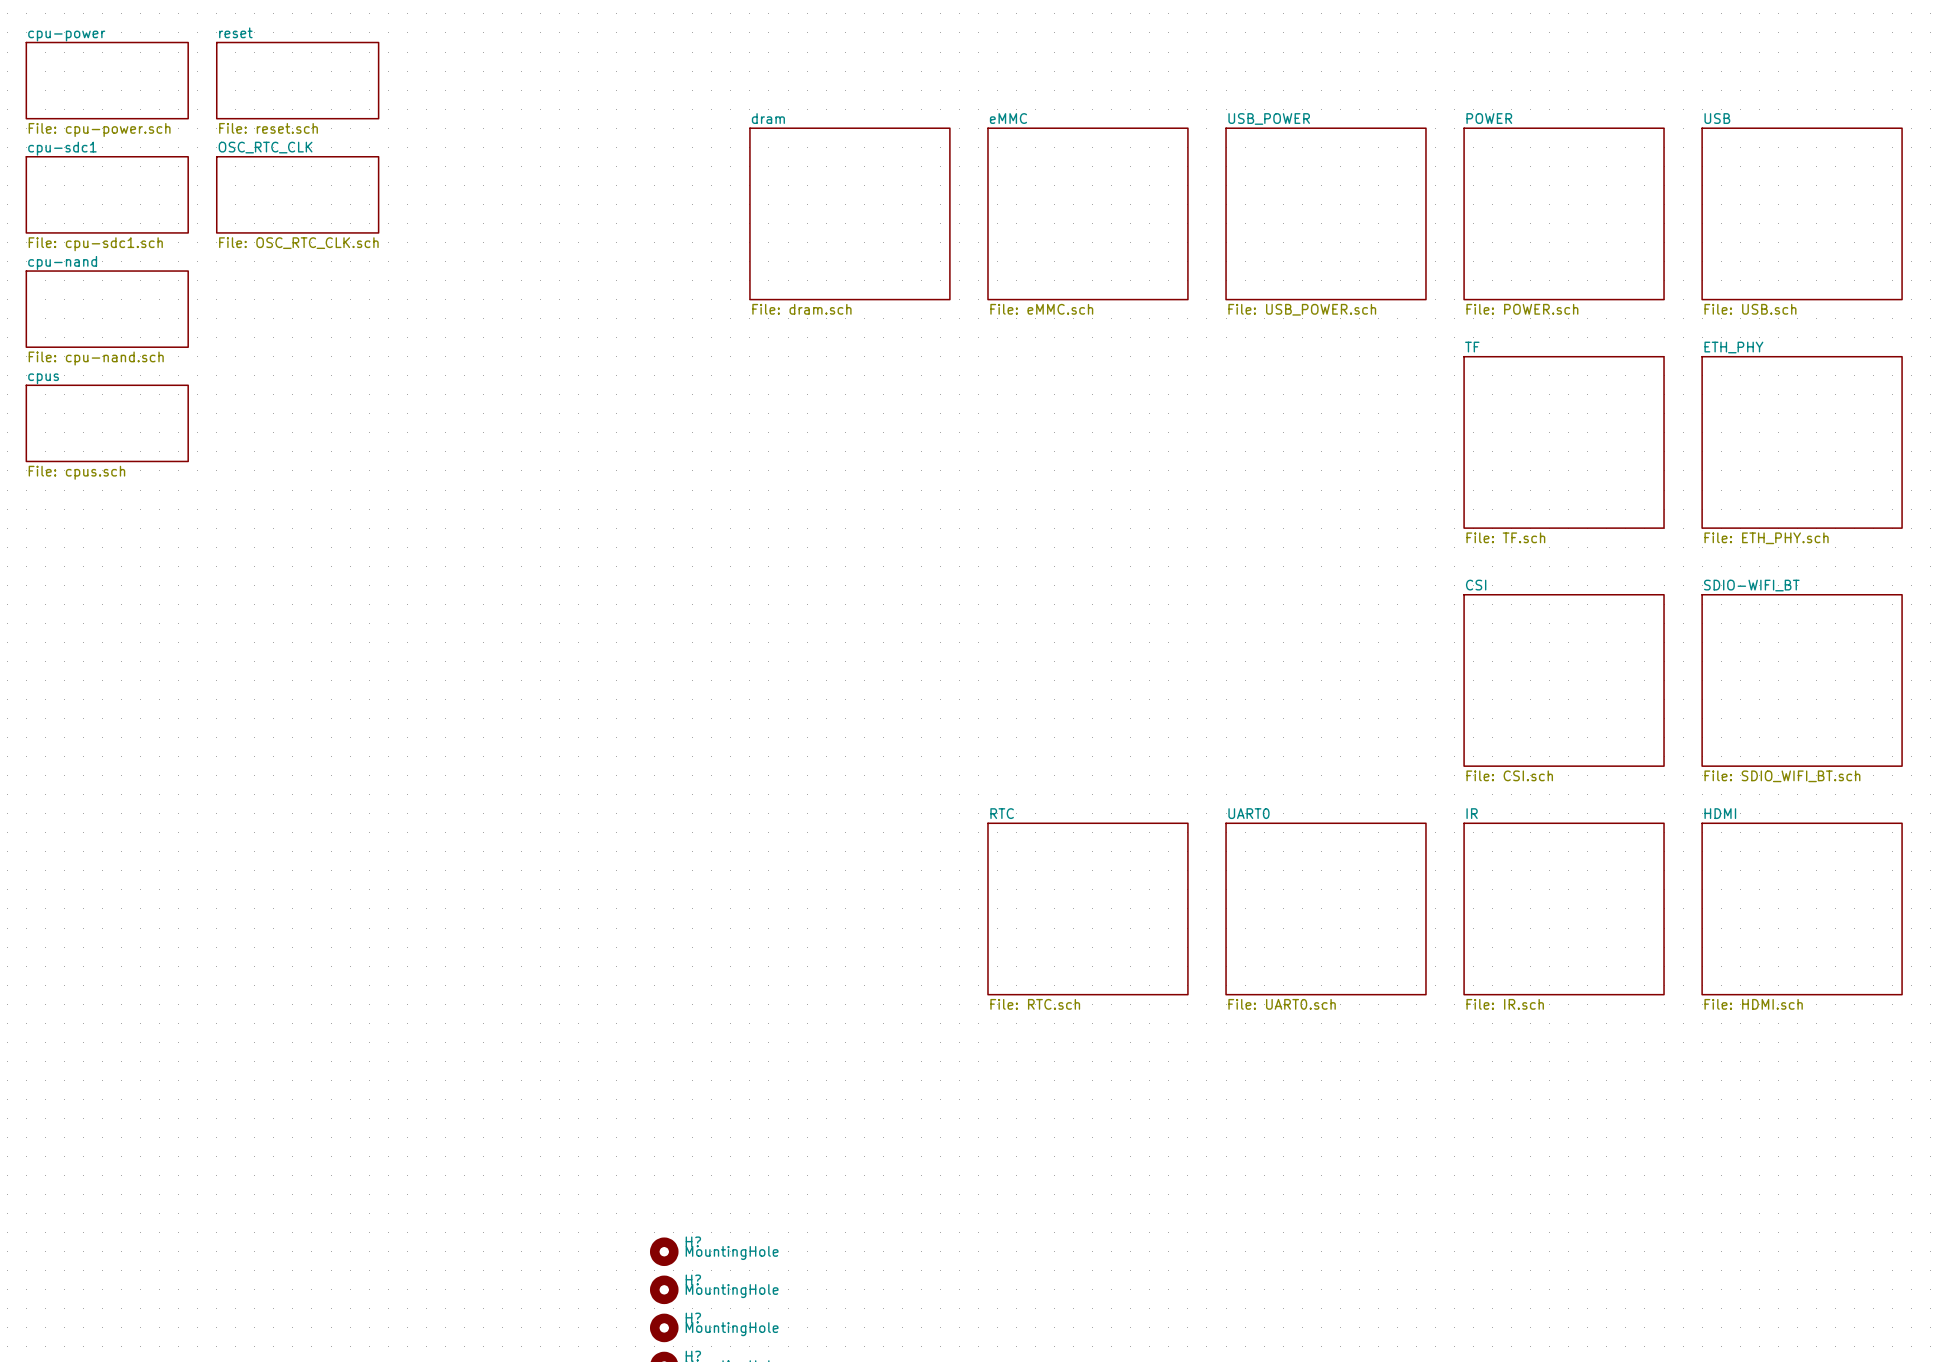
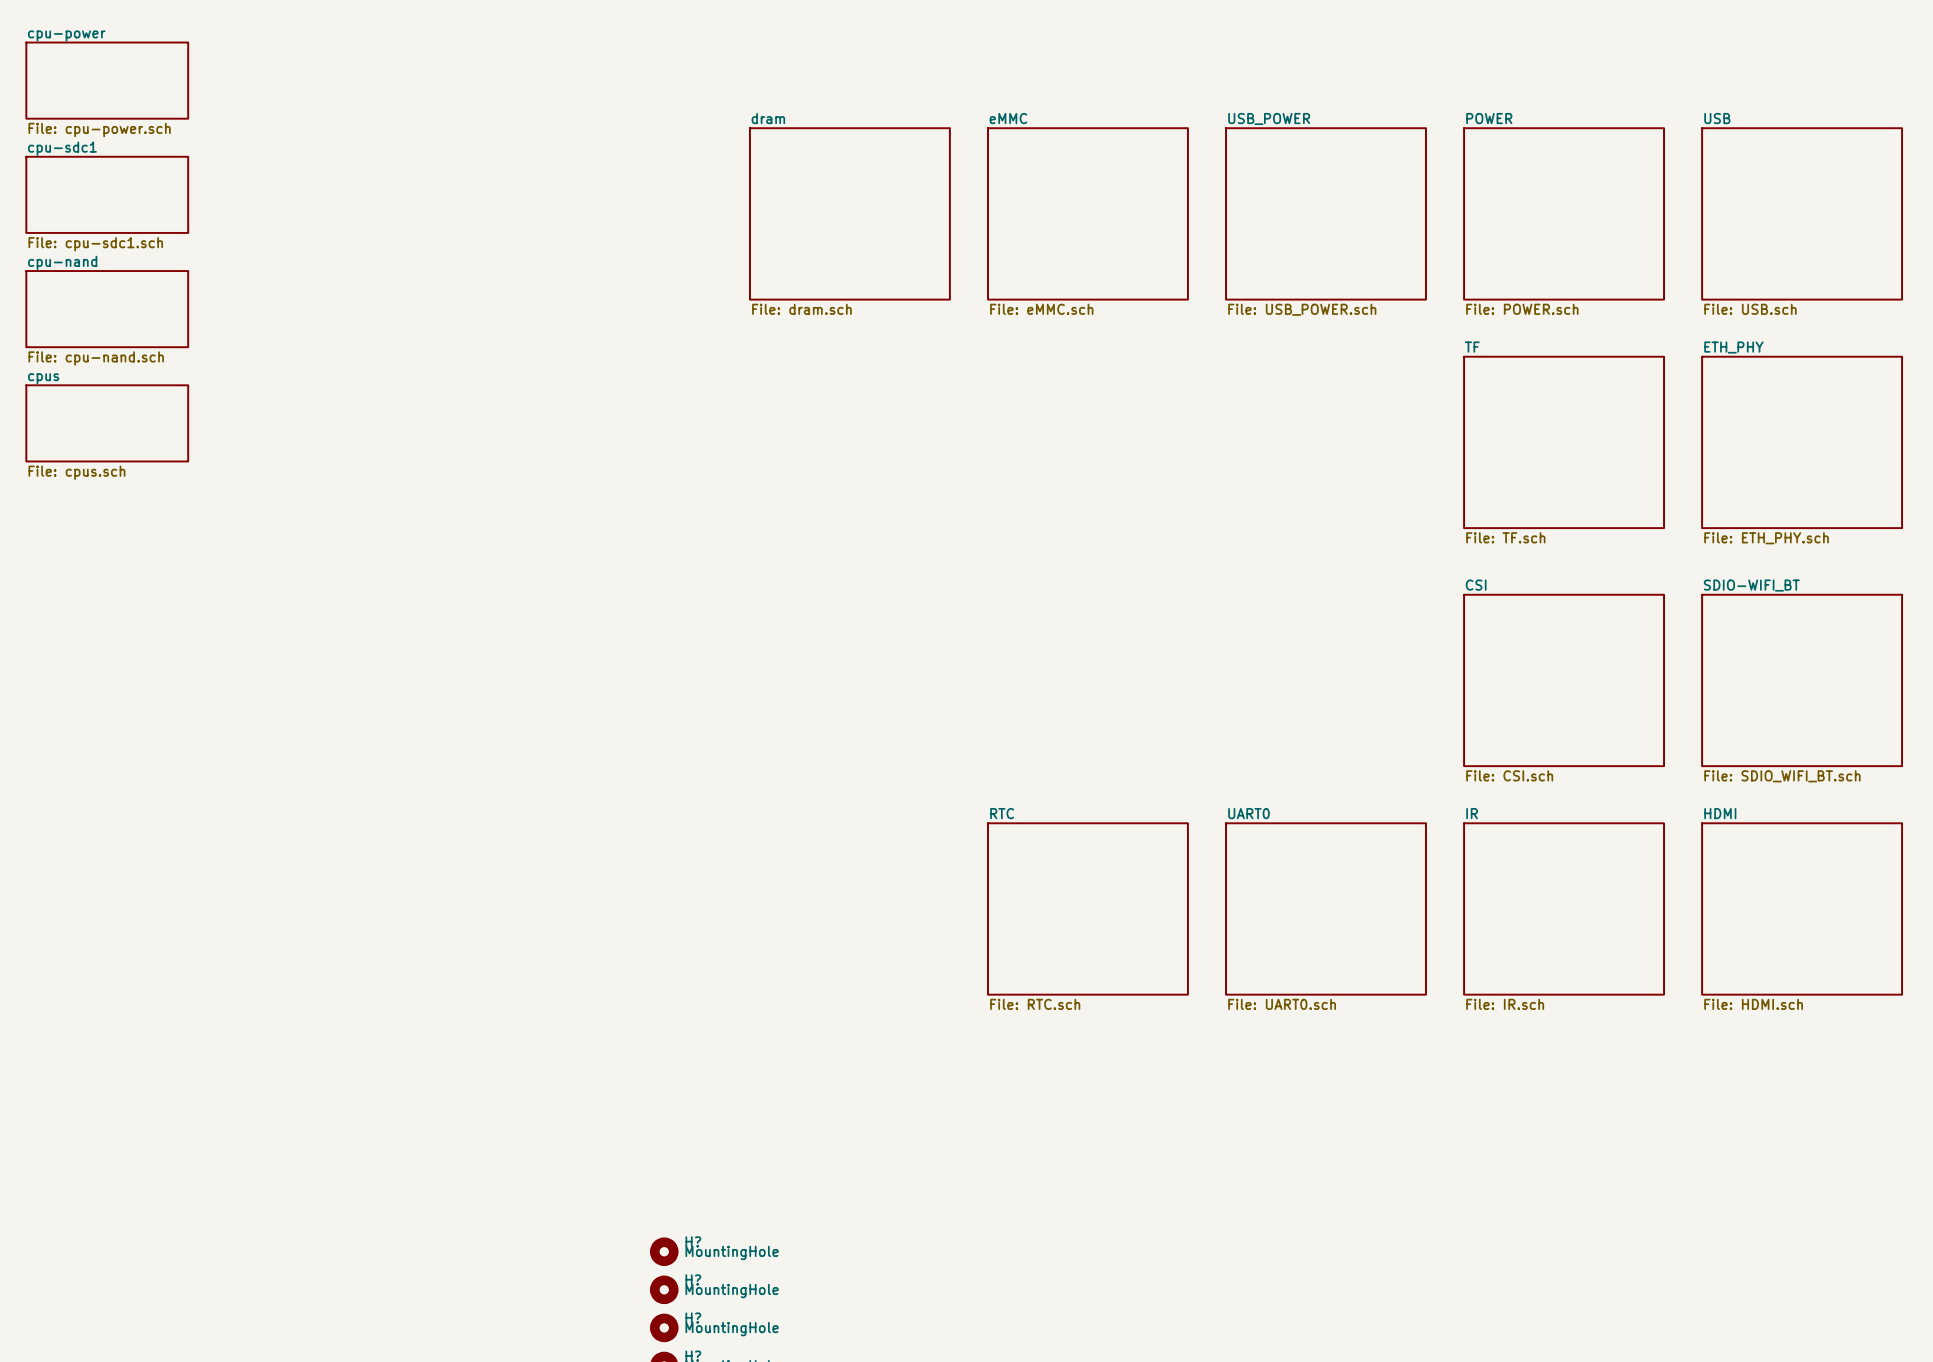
sheet reset: File: reset.sch (297, 80) -> none
sheet OSC_RTC_CLK: File: OSC_RTC_CLK.sch (297, 194) -> none

